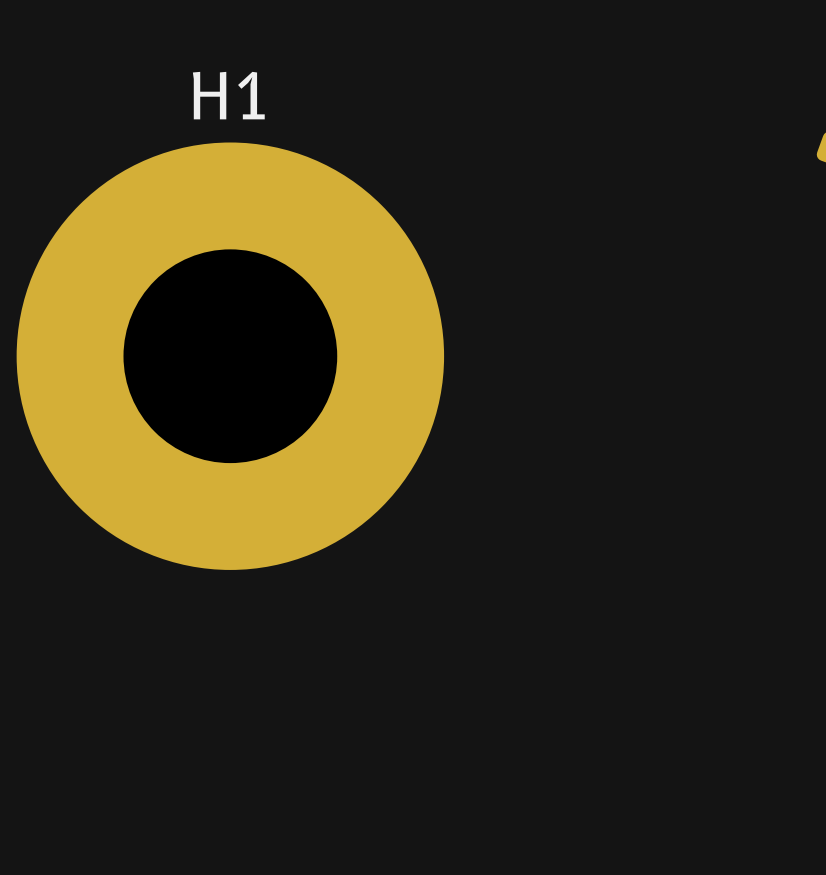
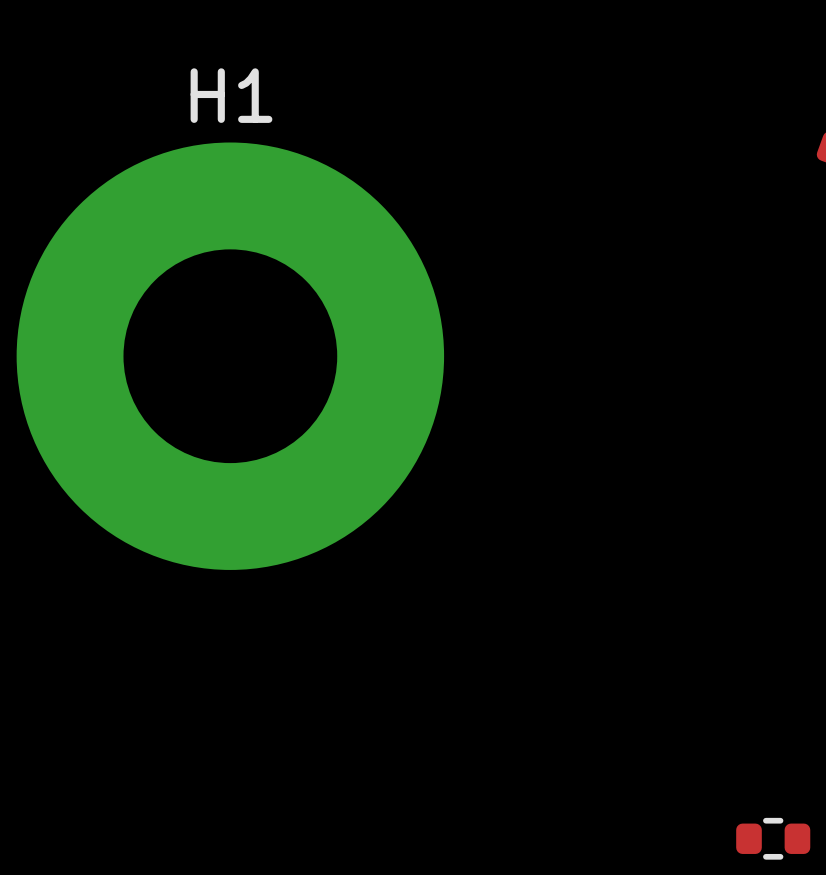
part: none -> (773, 838)

